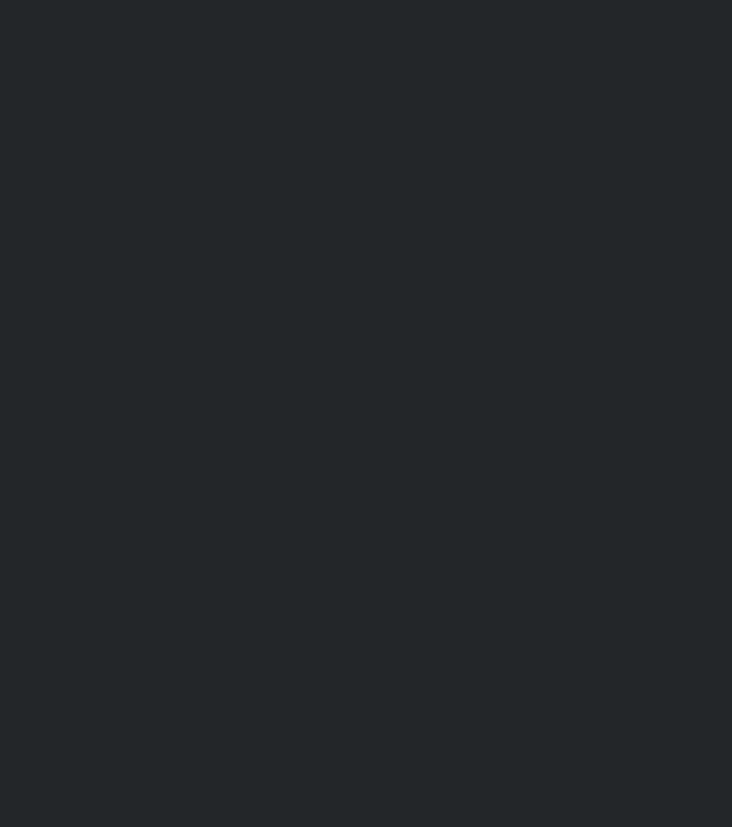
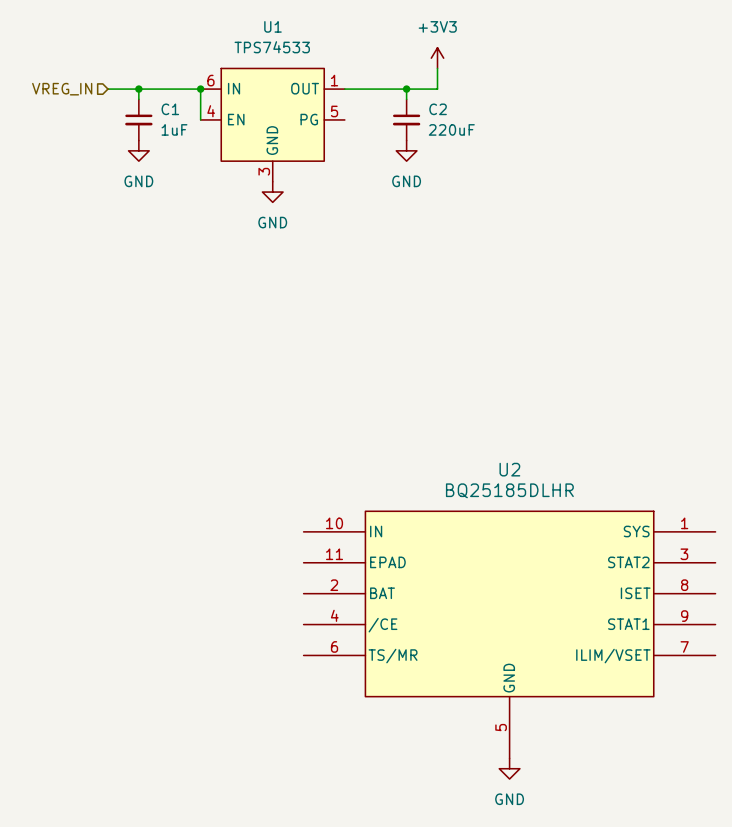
power symbol: none -> +3V3 (437, 58)
wire: none -> (437, 68) (437, 89) (344, 89)
hierarchical label: none -> VREG_IN (62, 89)
wire: none -> (107, 89) (200, 89) (200, 119)
wire: none -> (138, 89) (138, 99)
junction: none -> (138, 89)
junction: none -> (200, 89)
wire: none -> (406, 89) (406, 99)
junction: none -> (406, 89)
C1: none -> 1uF (138, 119)
C2: none -> 220uF (406, 119)
U1: none -> TPS74533 (272, 125)
power symbol: none -> GND (138, 150)
power symbol: none -> GND (406, 150)
power symbol: none -> GND (272, 192)
U2: none -> BQ25185DLHR (509, 634)
power symbol: none -> GND (509, 768)

